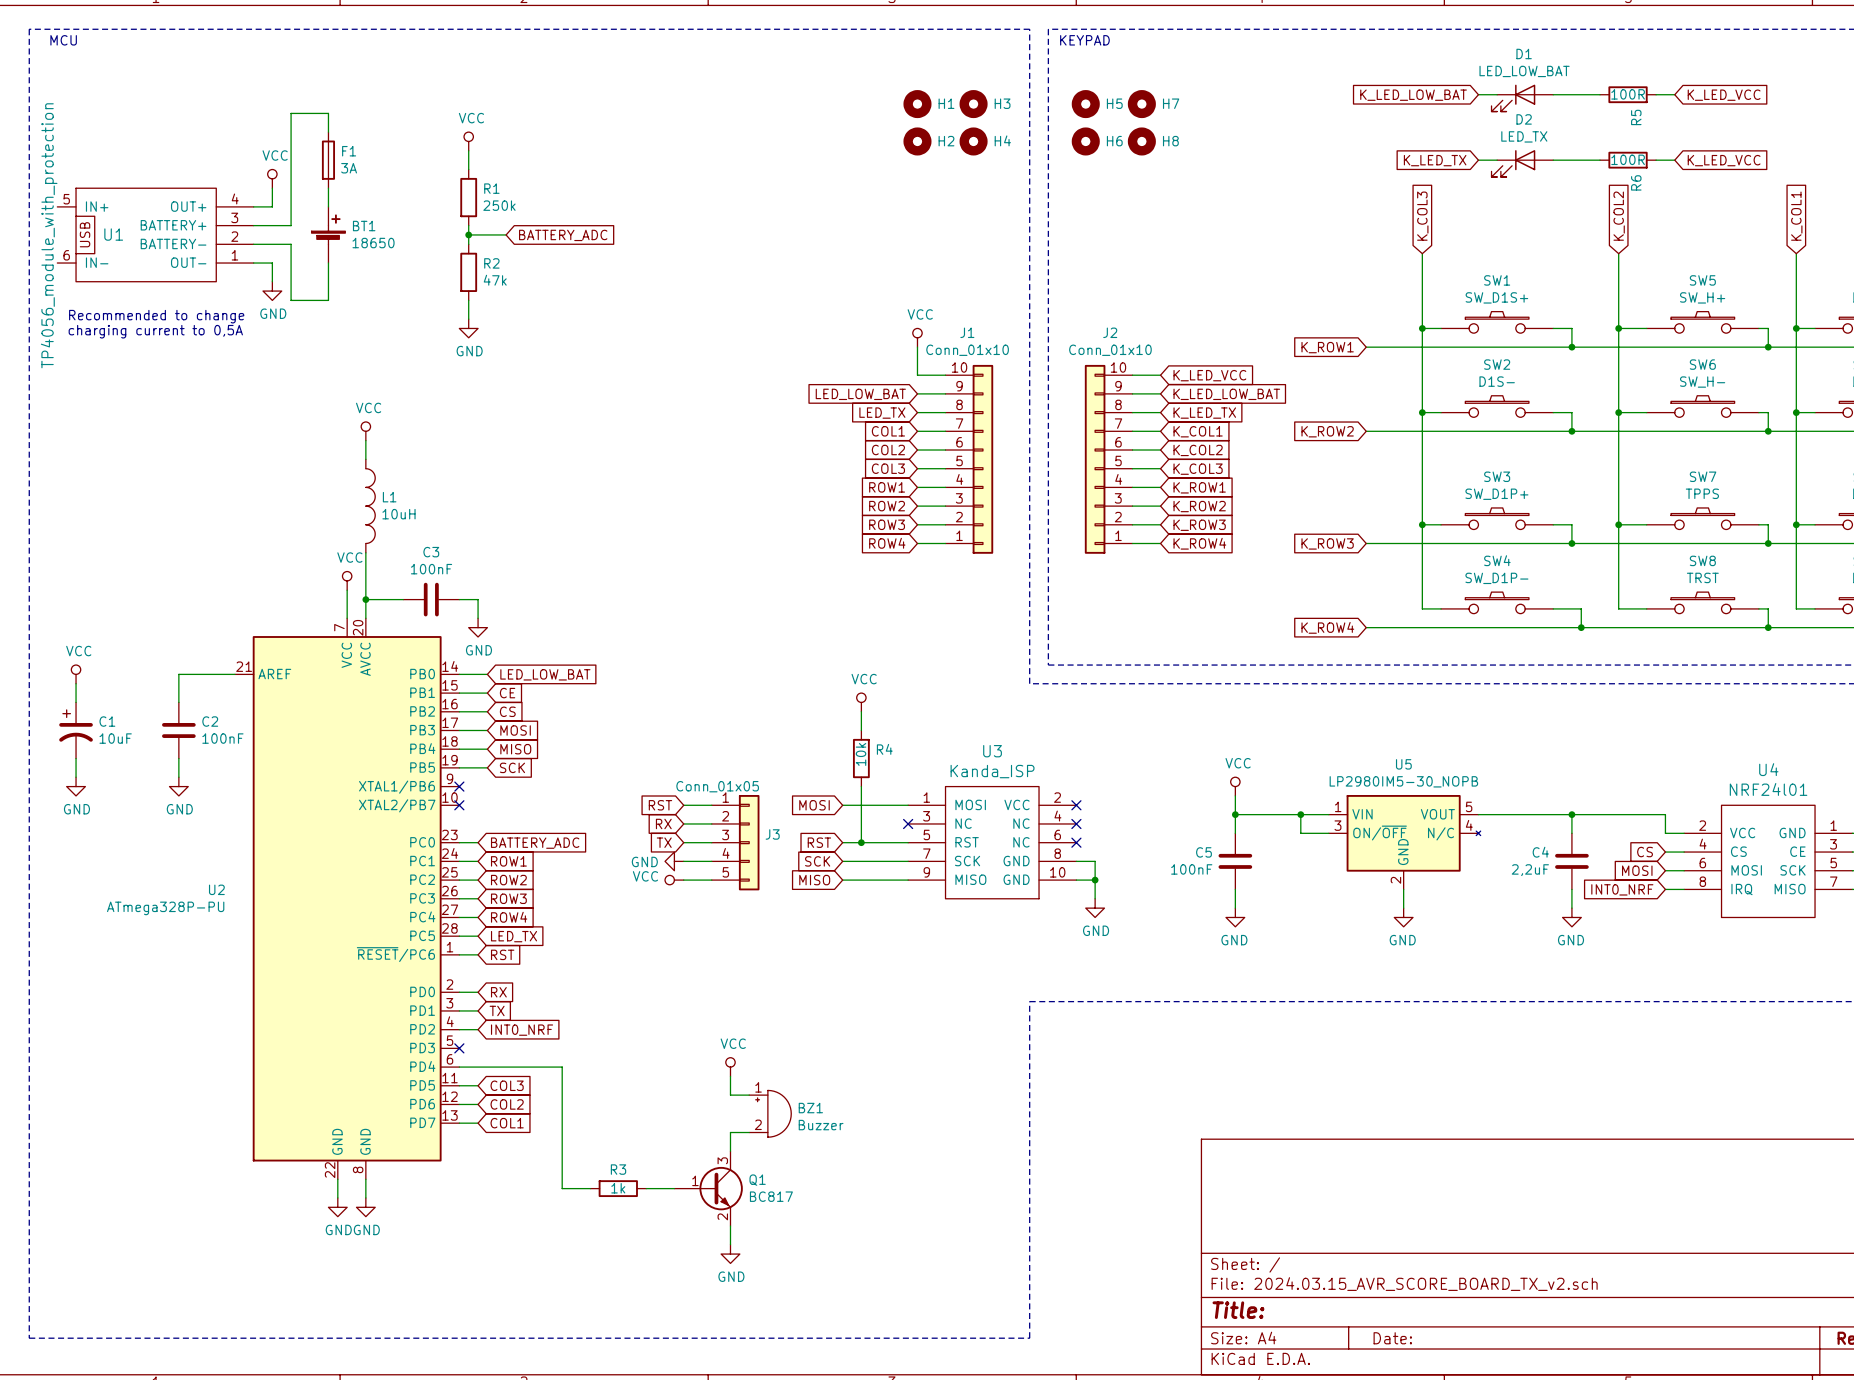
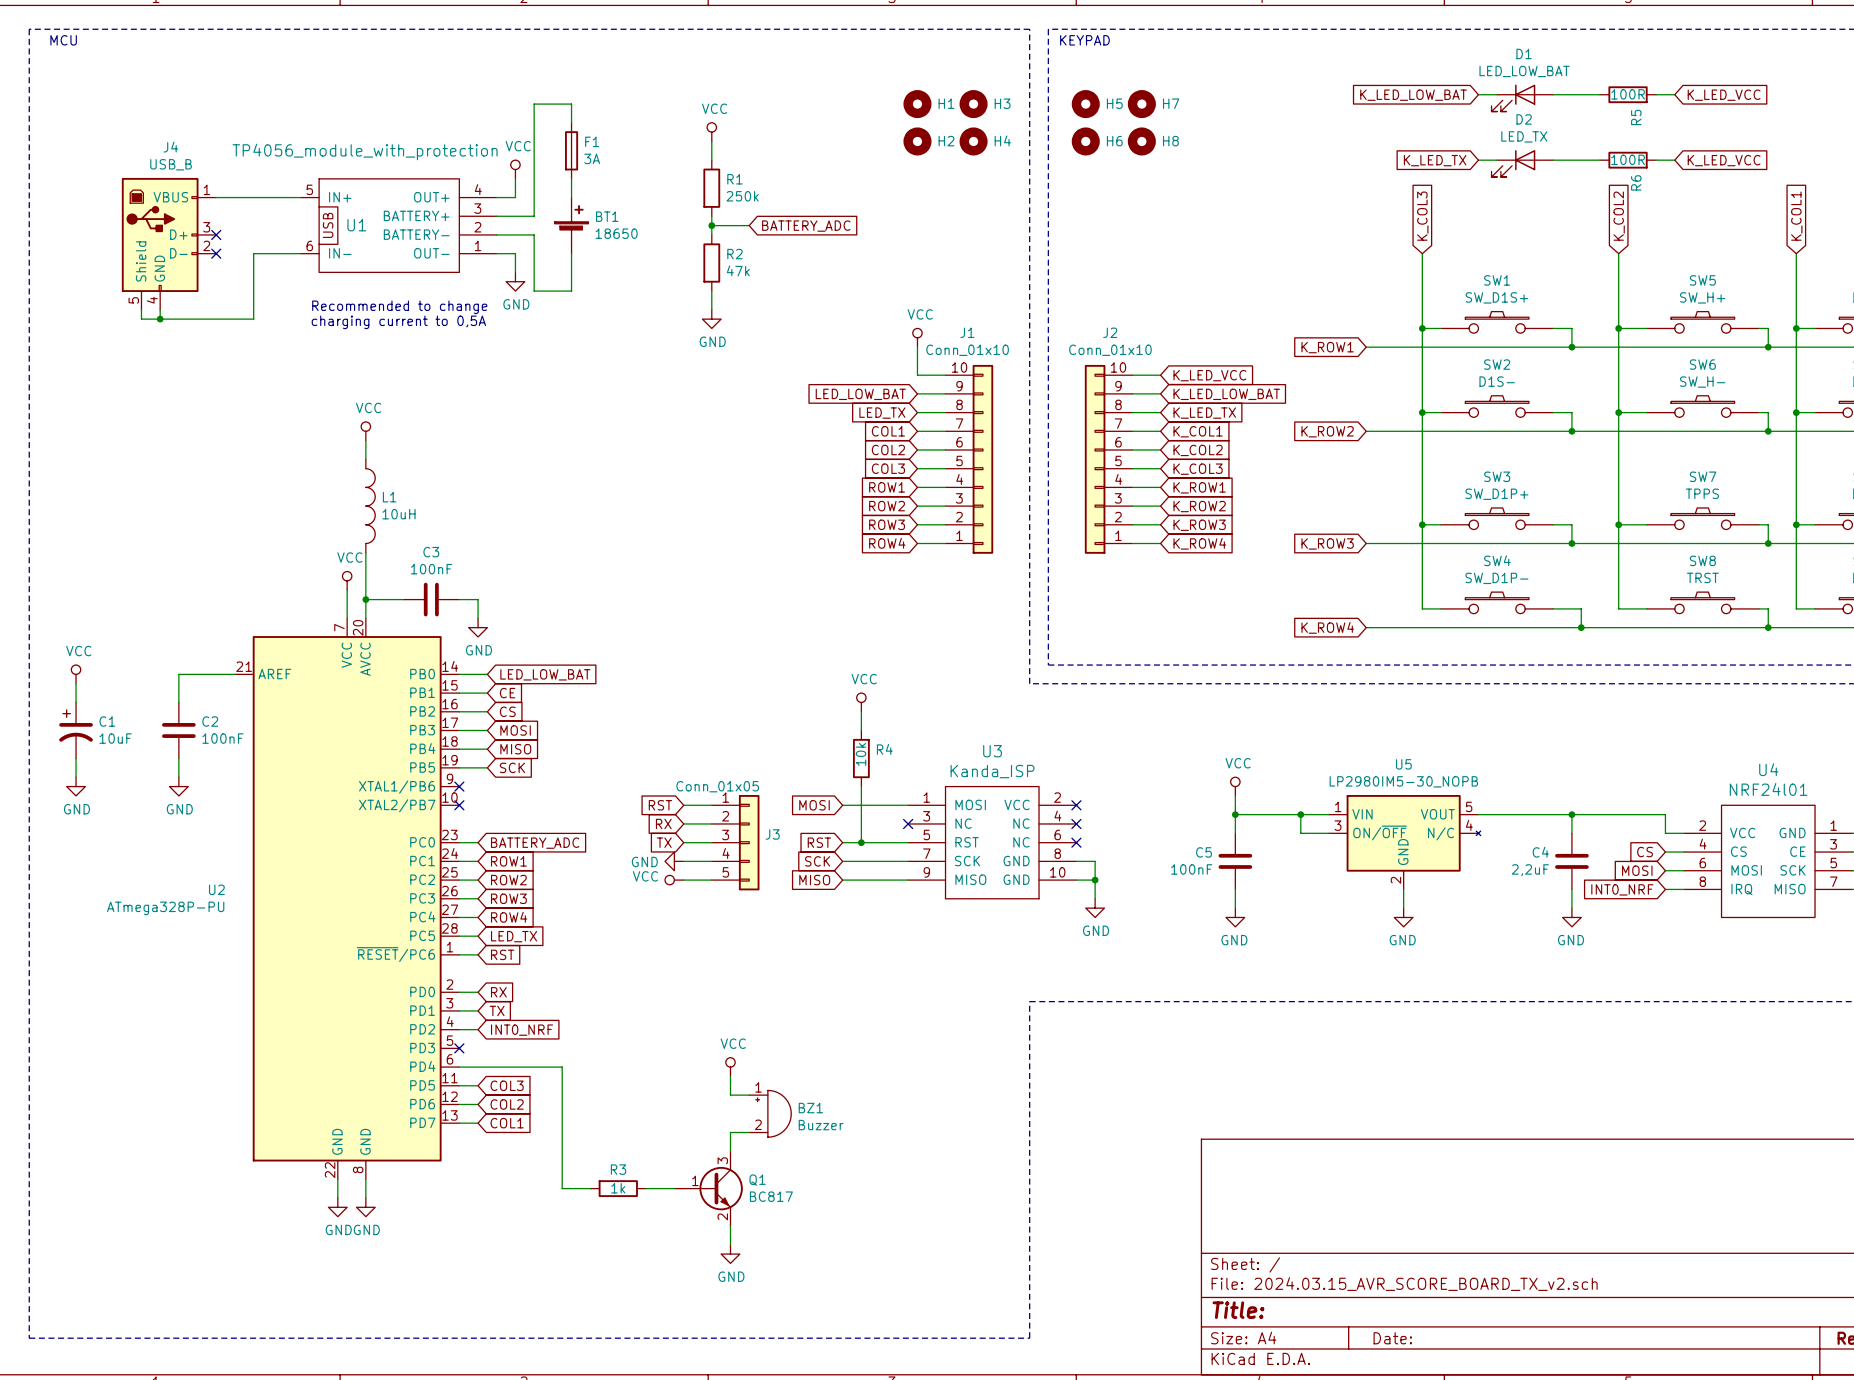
wire: none -> (571, 122) (571, 104) (534, 104) (534, 216) (496, 216)
wire: (328, 132) (328, 113) (291, 113) (291, 225) (253, 225) -> none
power symbol: none -> VCC (711, 132)
power symbol position: VCC (468, 141) -> VCC (515, 169)
wire: none -> (711, 141) (711, 160)
wire: (468, 150) (468, 169) -> (571, 178) (571, 197)
F1 position: (328, 160) -> (571, 150)
power symbol: VCC (272, 178) -> none
wire: none -> (515, 178) (515, 197) (496, 197)
wire: (272, 188) (272, 206) (253, 206) -> none
wire: (328, 188) (328, 206) -> none
wire: none -> (216, 197) (300, 197)
R1 position: (468, 197) -> (711, 188)
wire: none -> (711, 216) (711, 234)
wire: (468, 225) (468, 244) -> none
wire: none -> (711, 225) (749, 225)
junction: none -> (711, 225)
global label: none -> BATTERY_ADC (806, 226)
U1 position: (155, 234) -> (398, 225)
no-connect mark: none -> (216, 234)
BT1 position: (328, 234) -> (571, 225)
junction: (468, 234) -> none
wire: none -> (506, 234) (534, 234) (534, 291) (571, 291) (571, 253)
U1 value rotation: 0° (49, 235) -> 90° clockwise (365, 152)
global label: BATTERY_ADC (563, 235) -> none
J4: none -> USB_B (169, 243)
wire: (253, 244) (291, 244) (291, 300) (328, 300) (328, 263) -> none
no-connect mark: none -> (216, 253)
wire: none -> (300, 253) (253, 253) (253, 319) (141, 319) (141, 309)
wire: none -> (496, 253) (515, 253) (515, 272)
wire: (253, 263) (272, 263) (272, 281) -> none
R2 position: (468, 272) -> (711, 263)
power symbol: GND (272, 291) -> none
wire: none -> (711, 291) (711, 309)
wire: (468, 300) (468, 319) -> none
text: none -> Recommended to change (399, 307)
wire: none -> (160, 309) (160, 319)
text: Recommended to change (156, 316) -> none
junction: none -> (160, 319)
power symbol: none -> GND (711, 319)
text: none -> charging current to 0,5A (398, 322)
power symbol position: GND (468, 328) -> GND (515, 281)
text: charging current to 0,5A (155, 331) -> none

